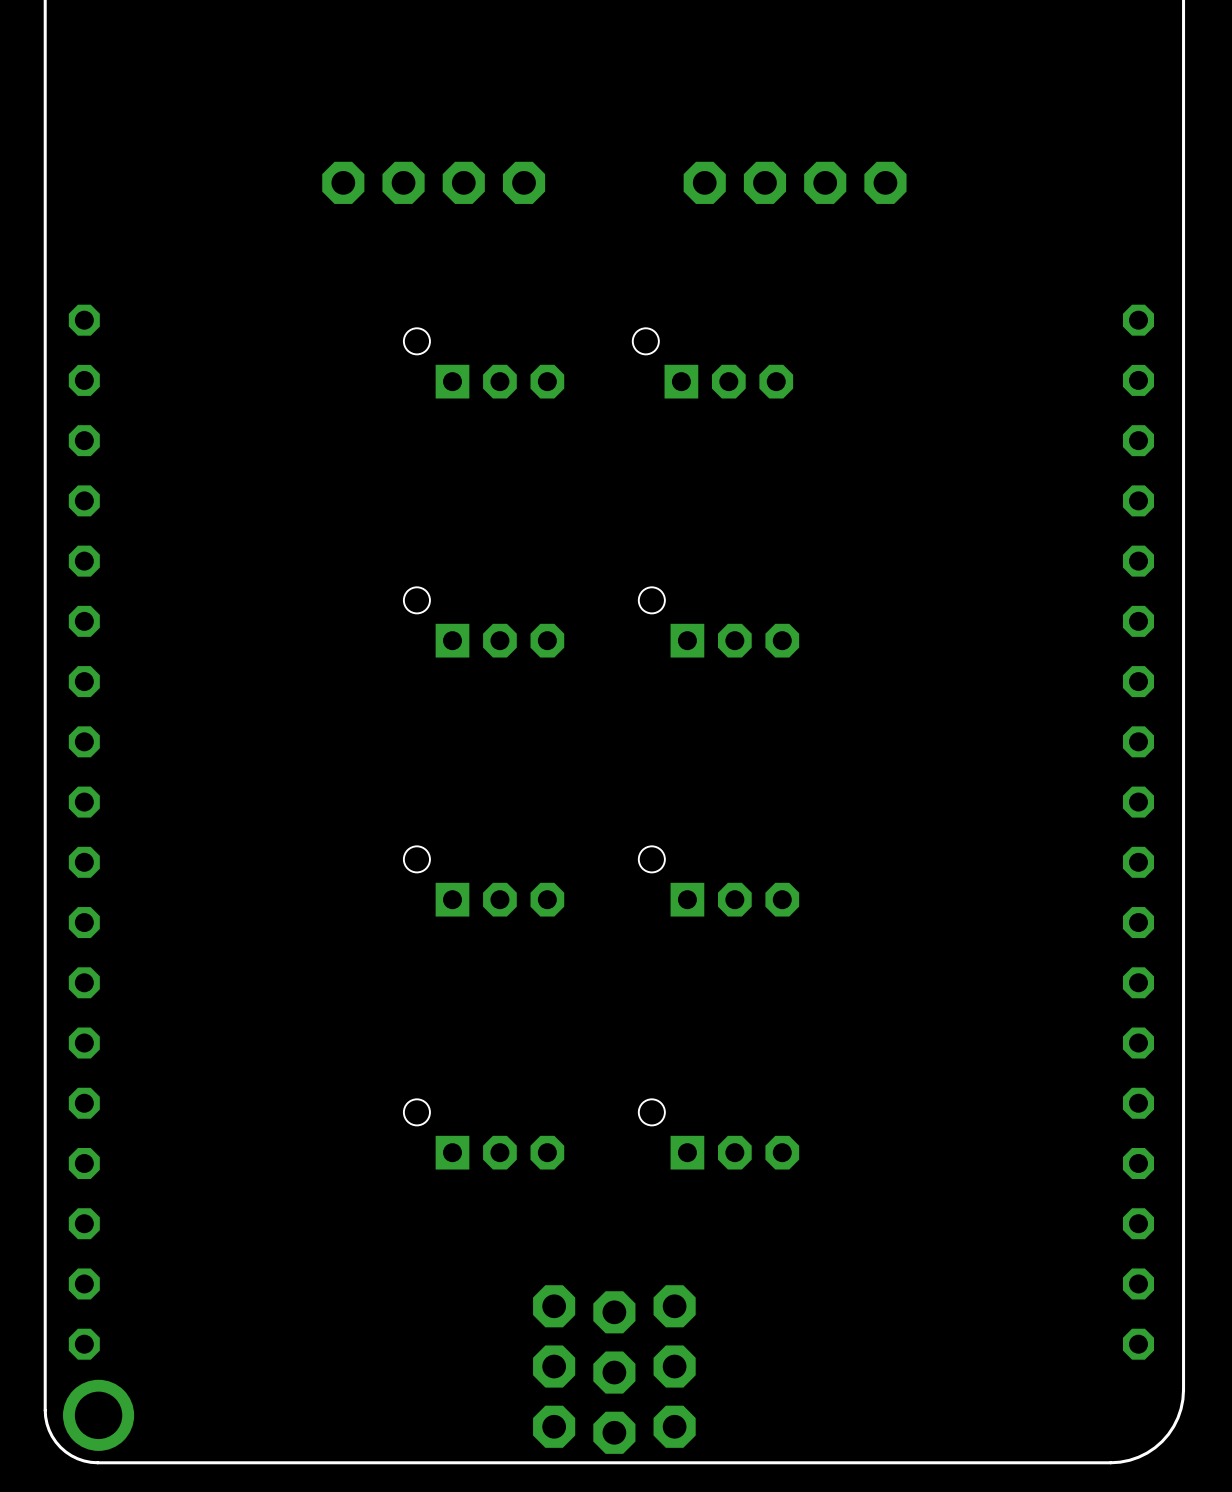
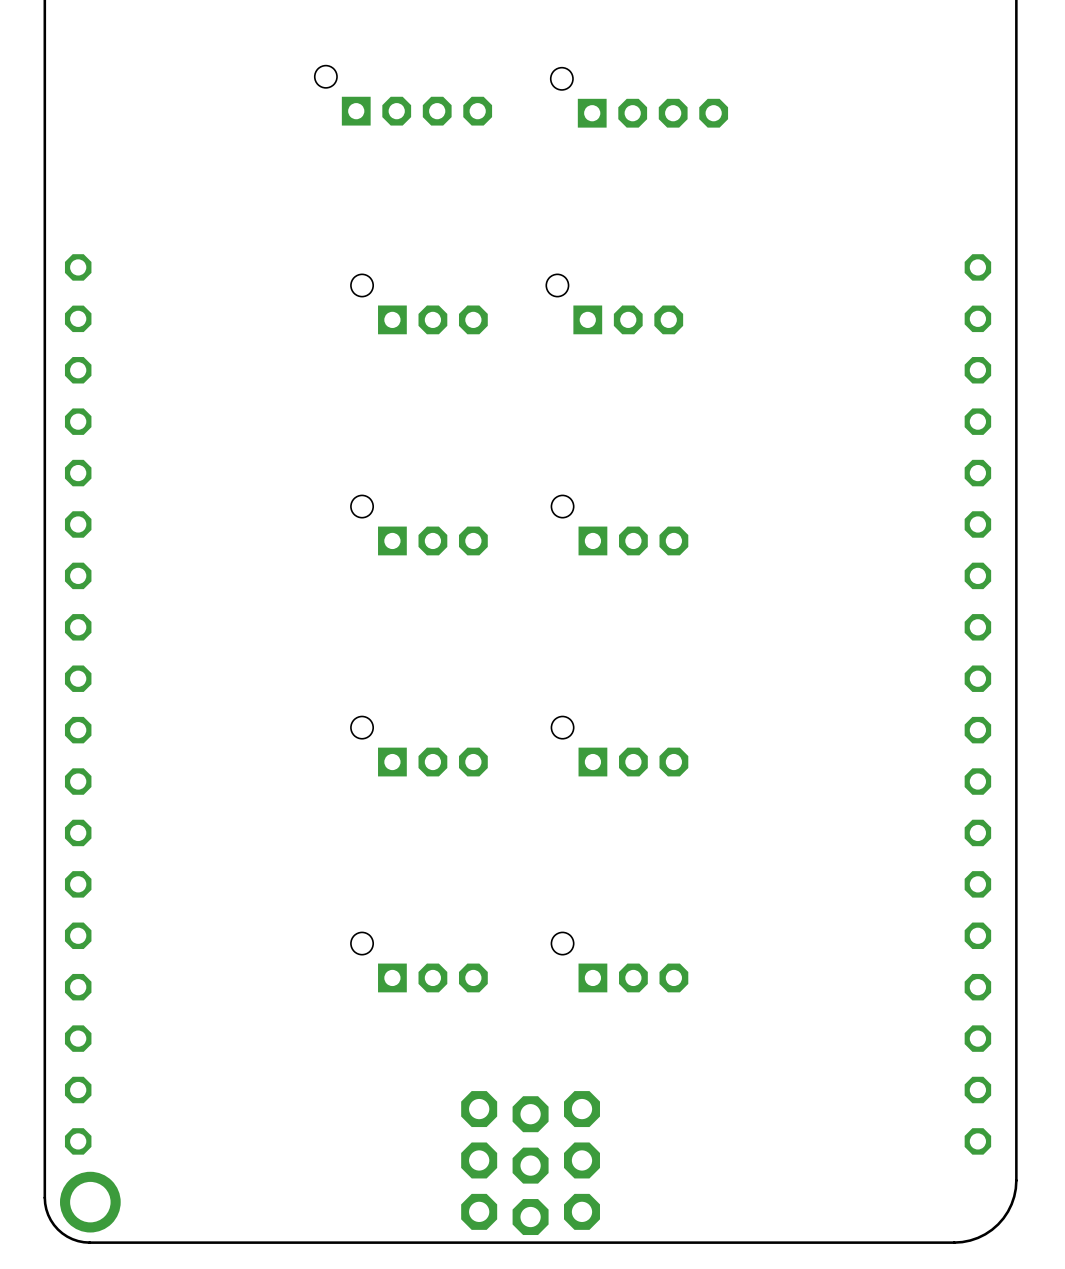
part: none -> (403, 95)
part: none -> (639, 97)
part: (433, 182) -> none
part: (795, 182) -> none

